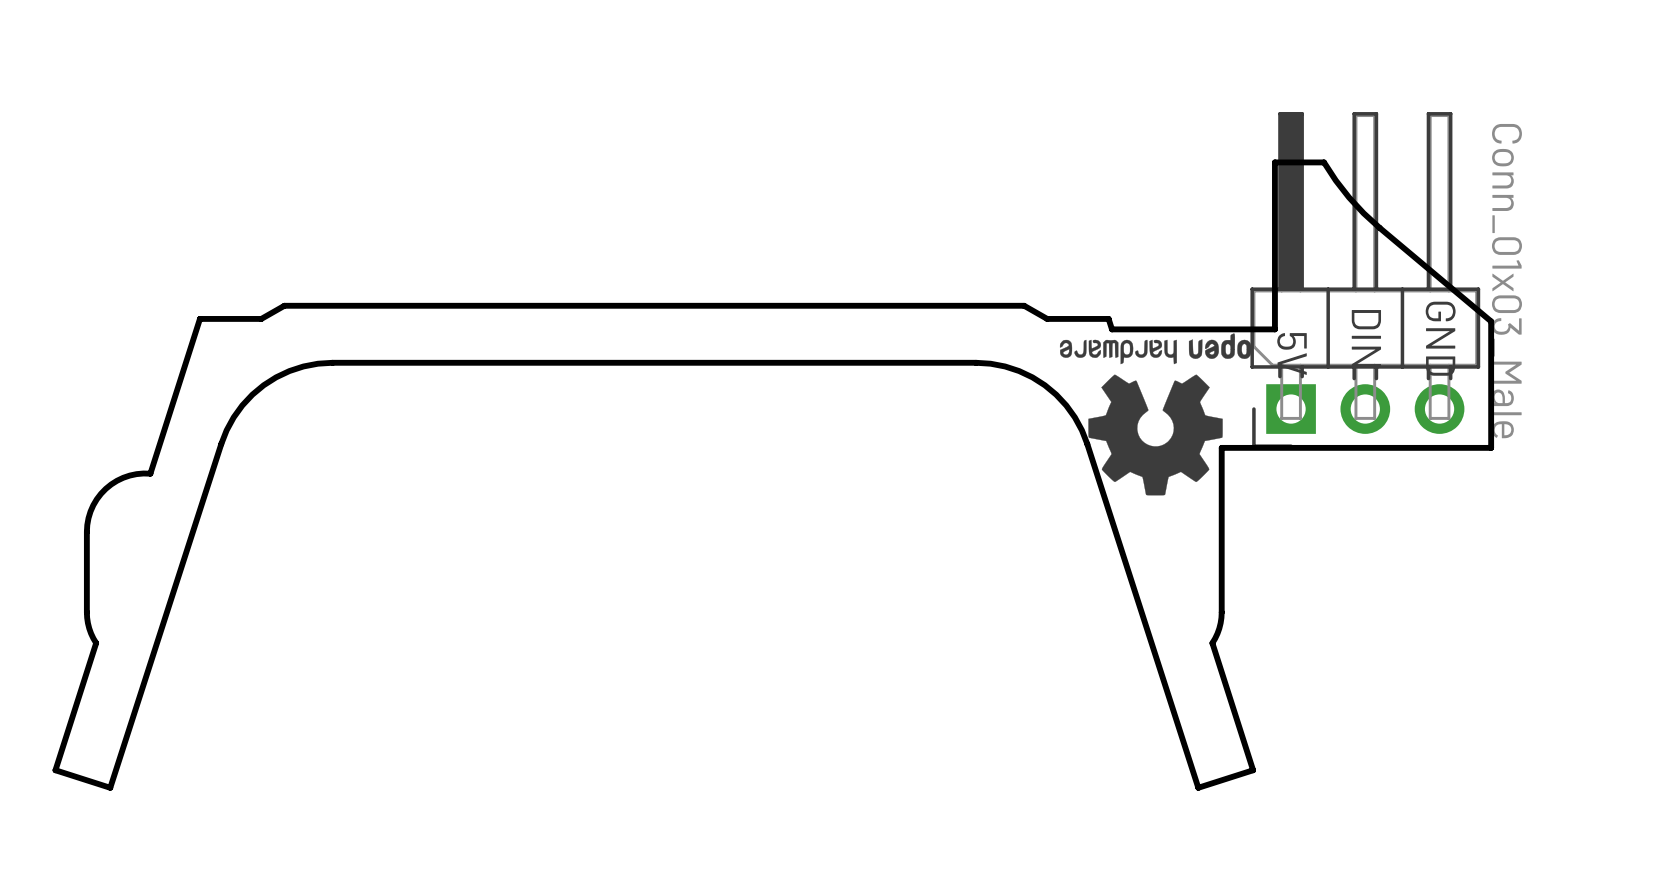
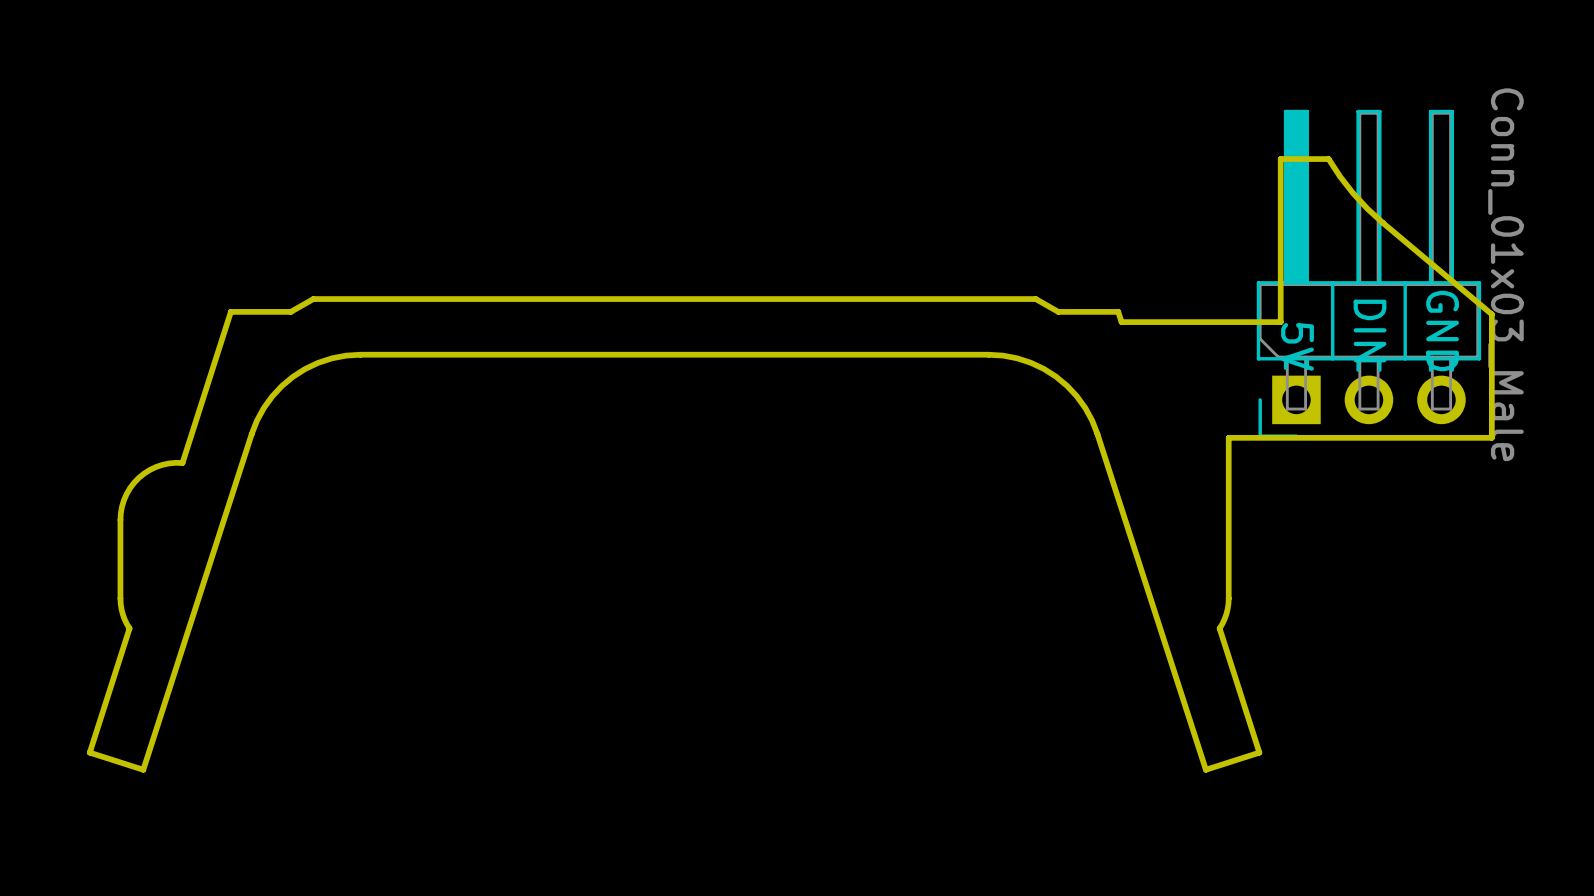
drawing: [1059, 333, 1252, 496] -> none

